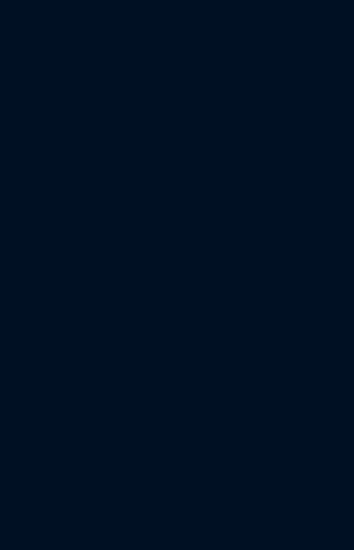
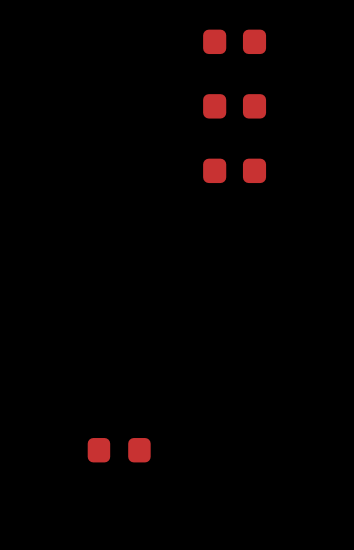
part: none -> (234, 41)
part: none -> (234, 106)
part: none -> (234, 170)
part: none -> (119, 450)

